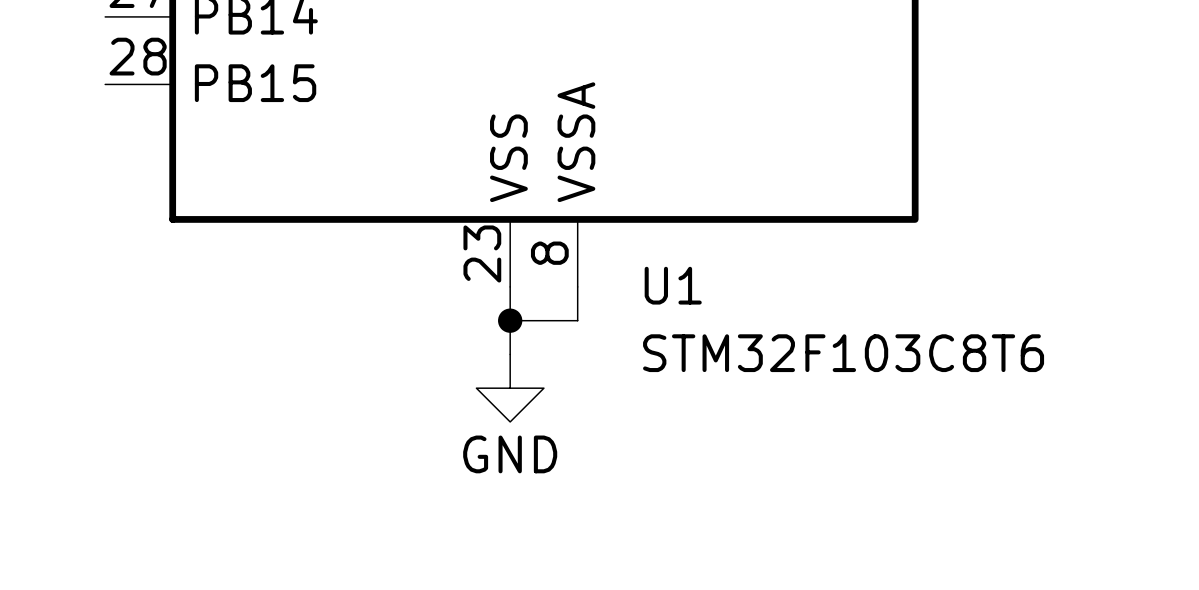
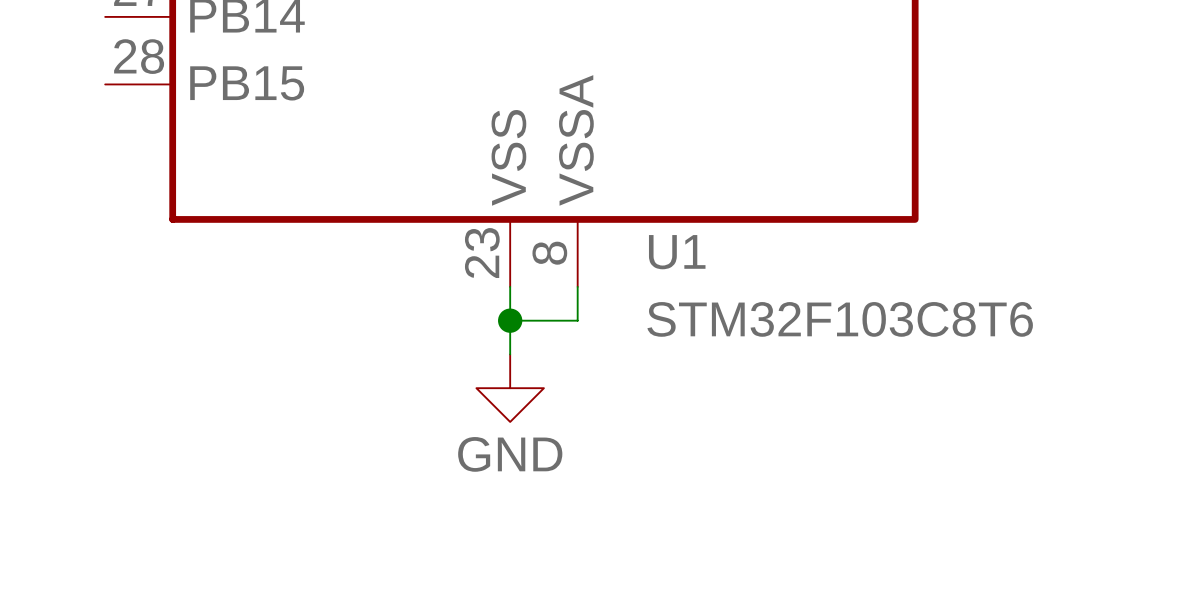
U1 name position: U1 (673, 285) -> U1 (677, 252)
U1 value position: STM32F103C8T6 (843, 353) -> STM32F103C8T6 (840, 319)

